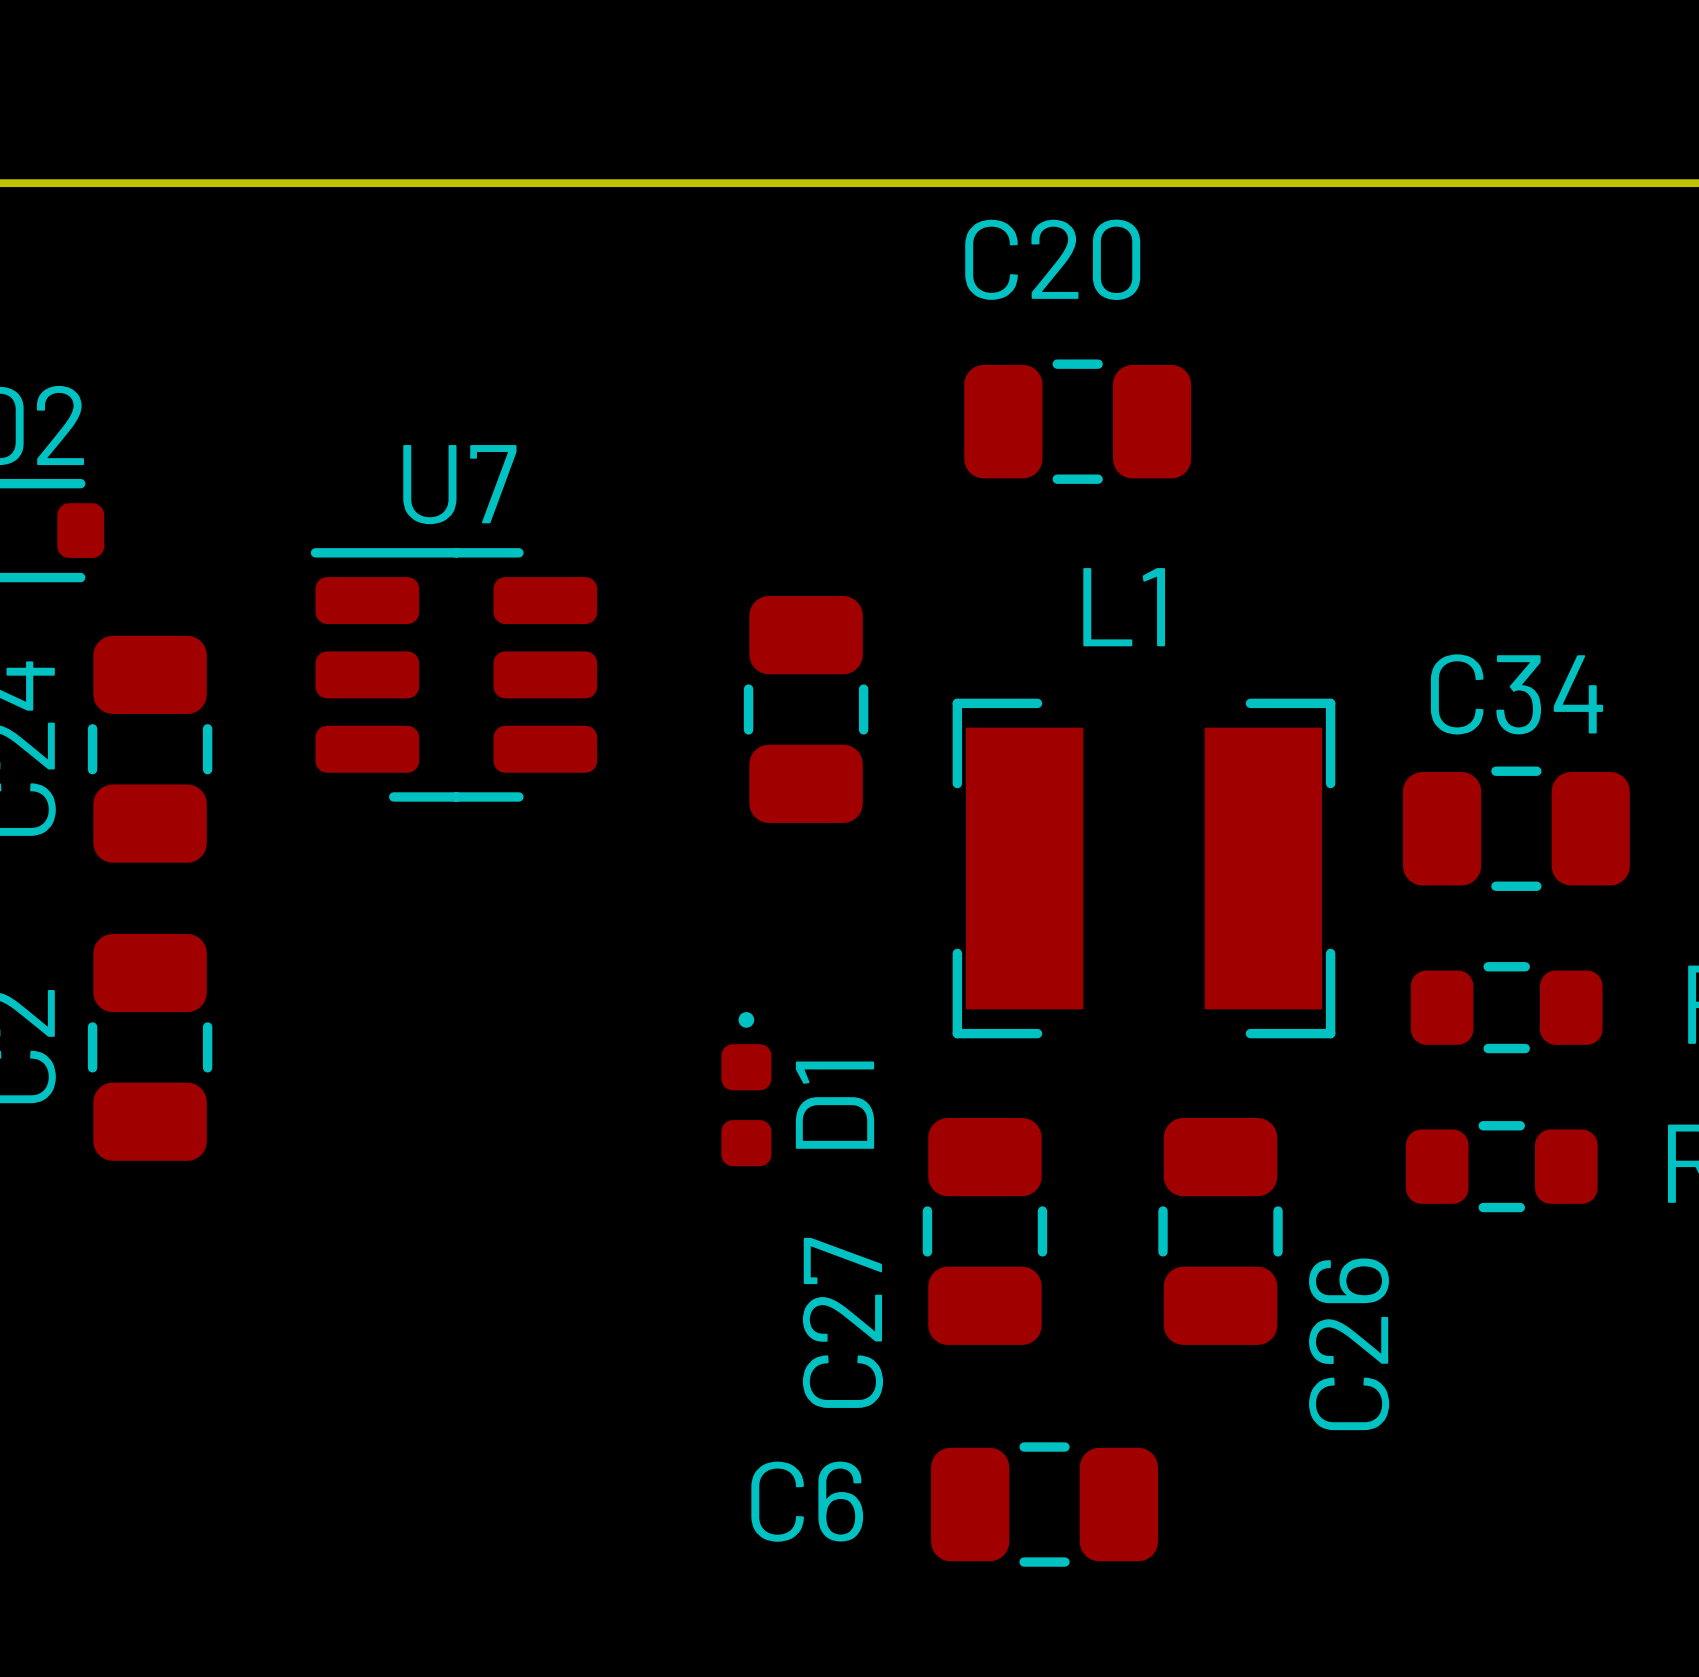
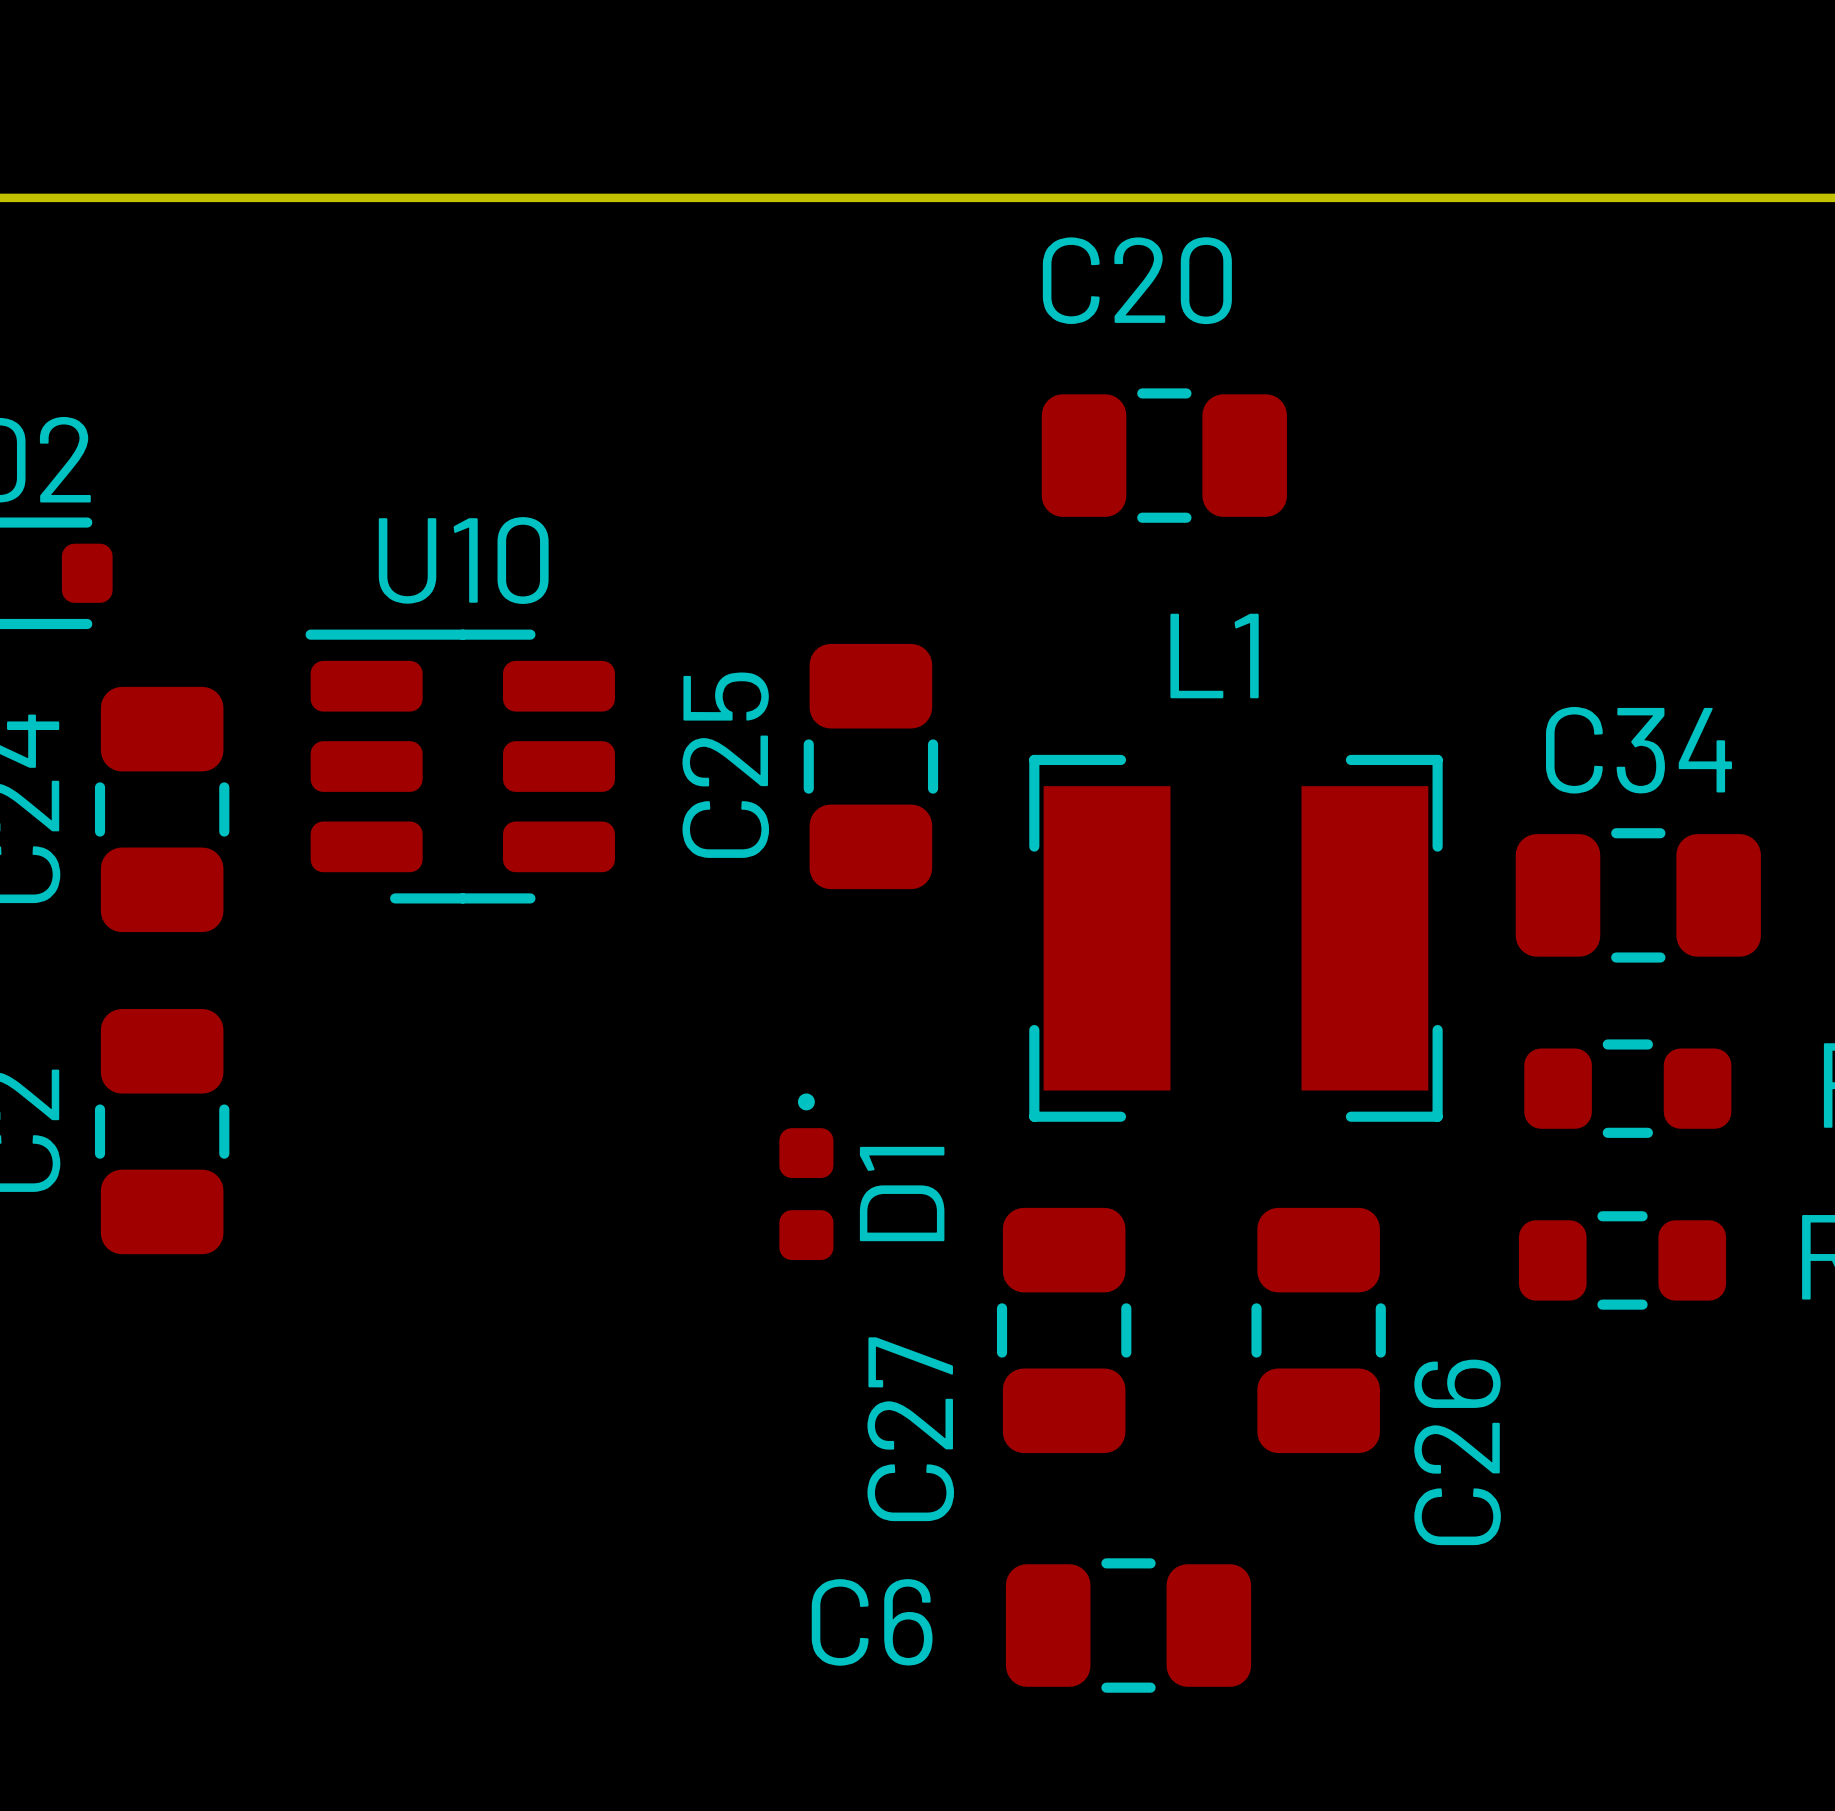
U7 name: U7 (459, 484) -> U10 (463, 560)
U7 position: (453, 674) -> (460, 766)
C25 name: none -> C25 (725, 765)

